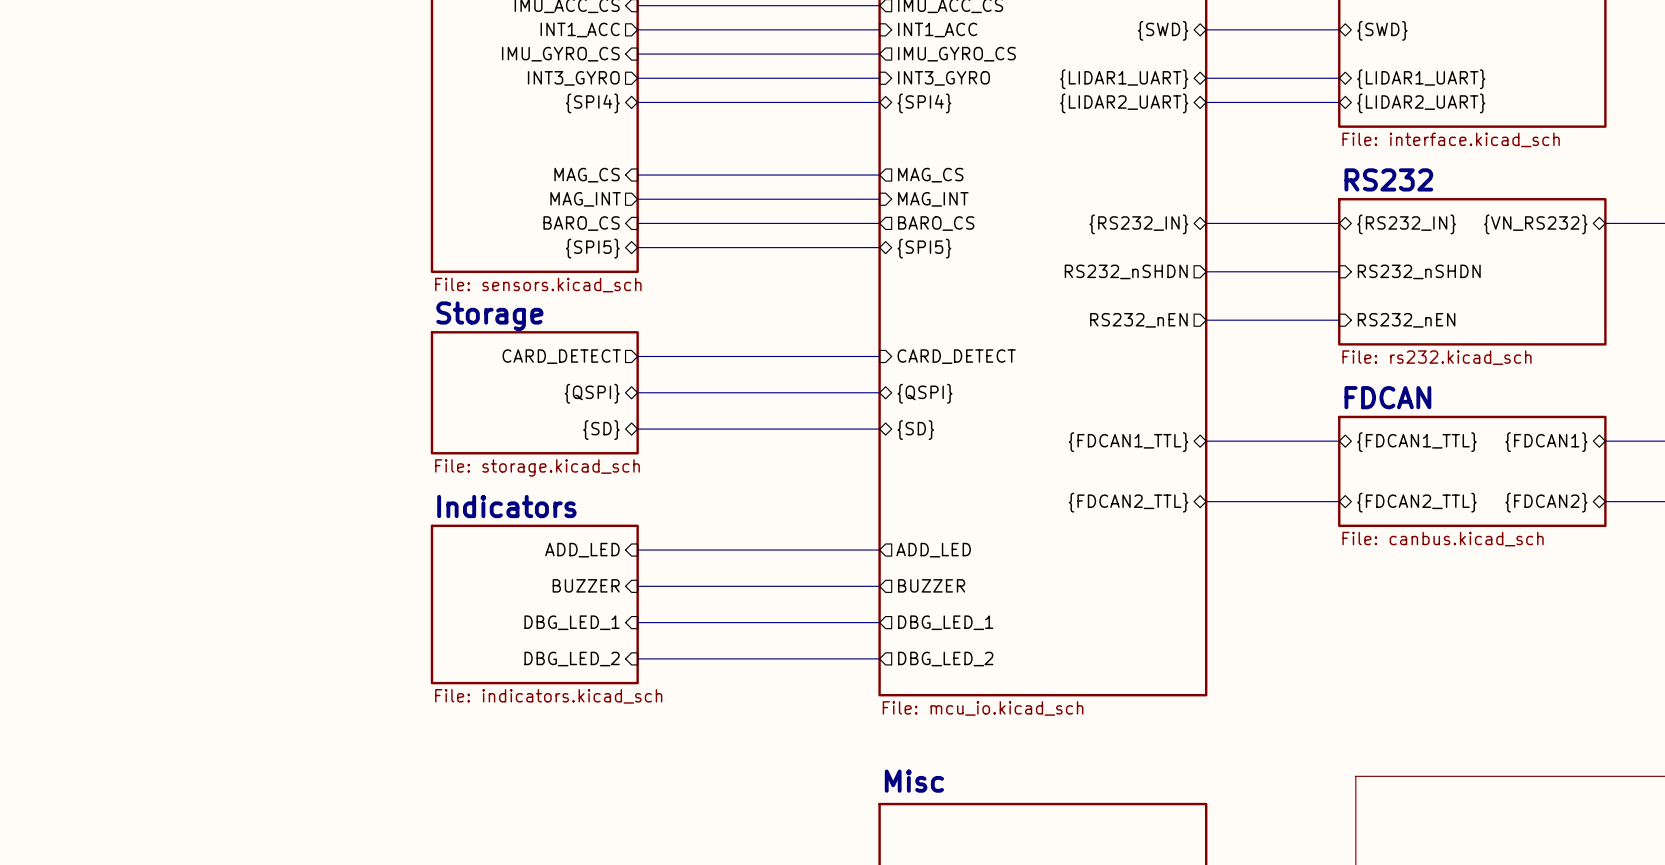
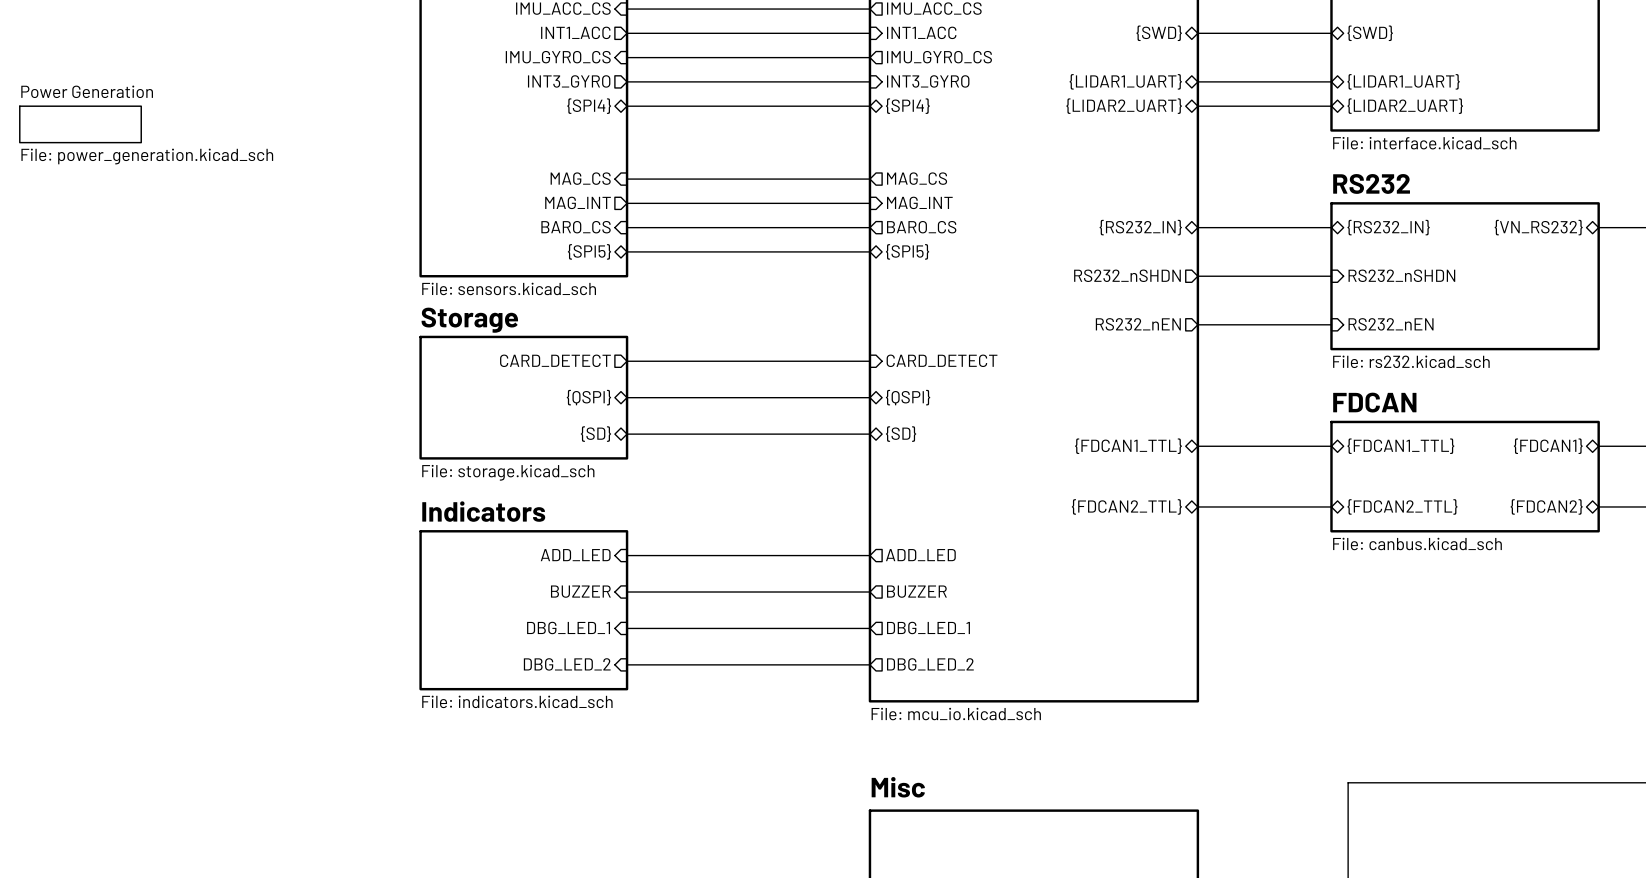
sheet Power Generation: none -> File: power_generation.kicad_sch (80, 124)

